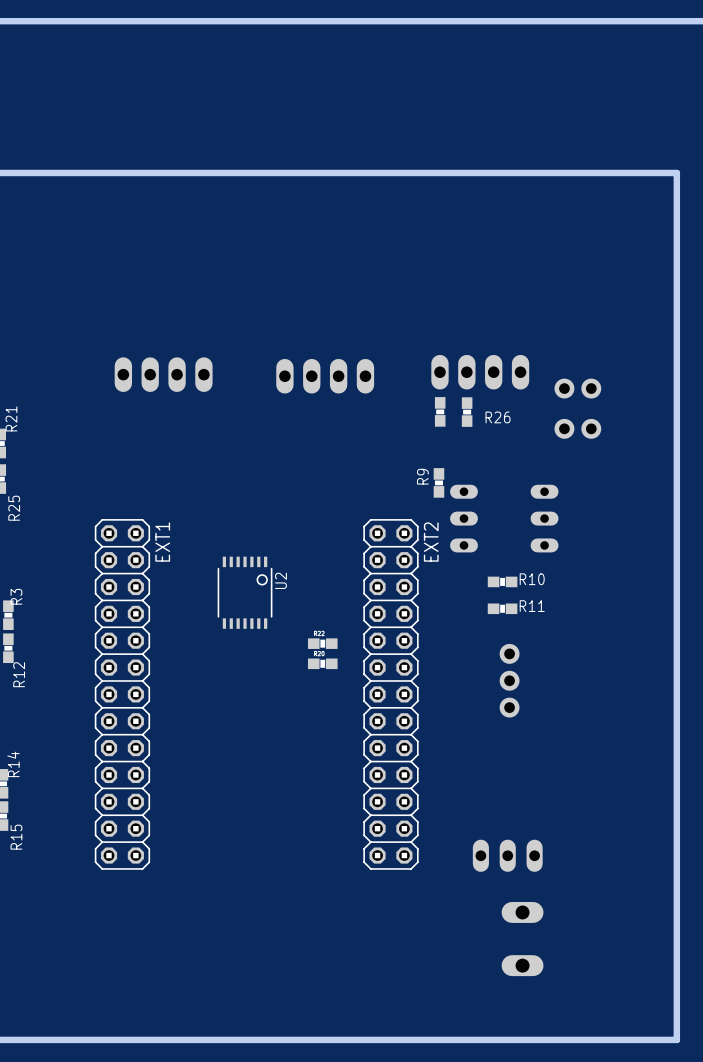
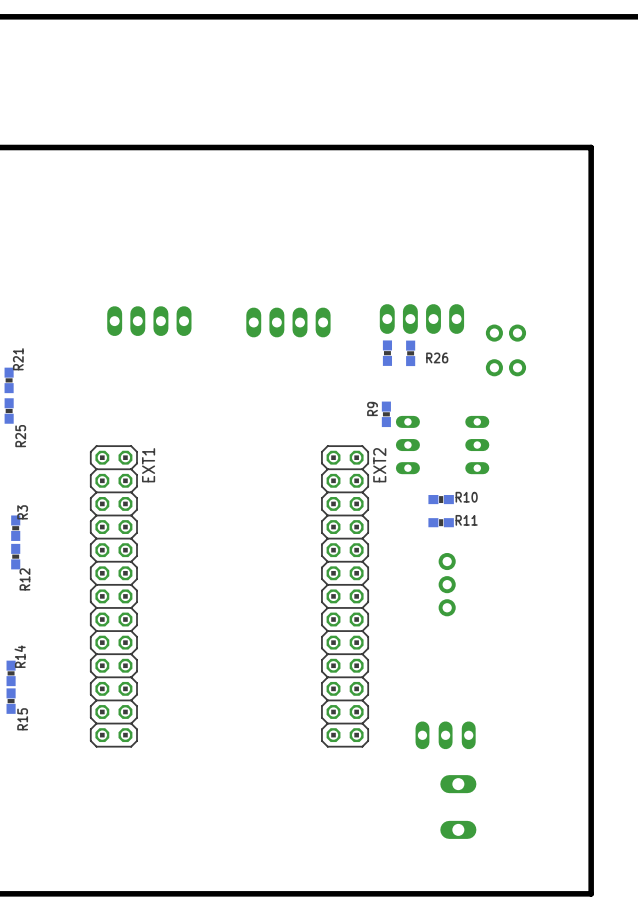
U2: (245, 592) -> none
part: (322, 643) -> none
part: (322, 663) -> none

